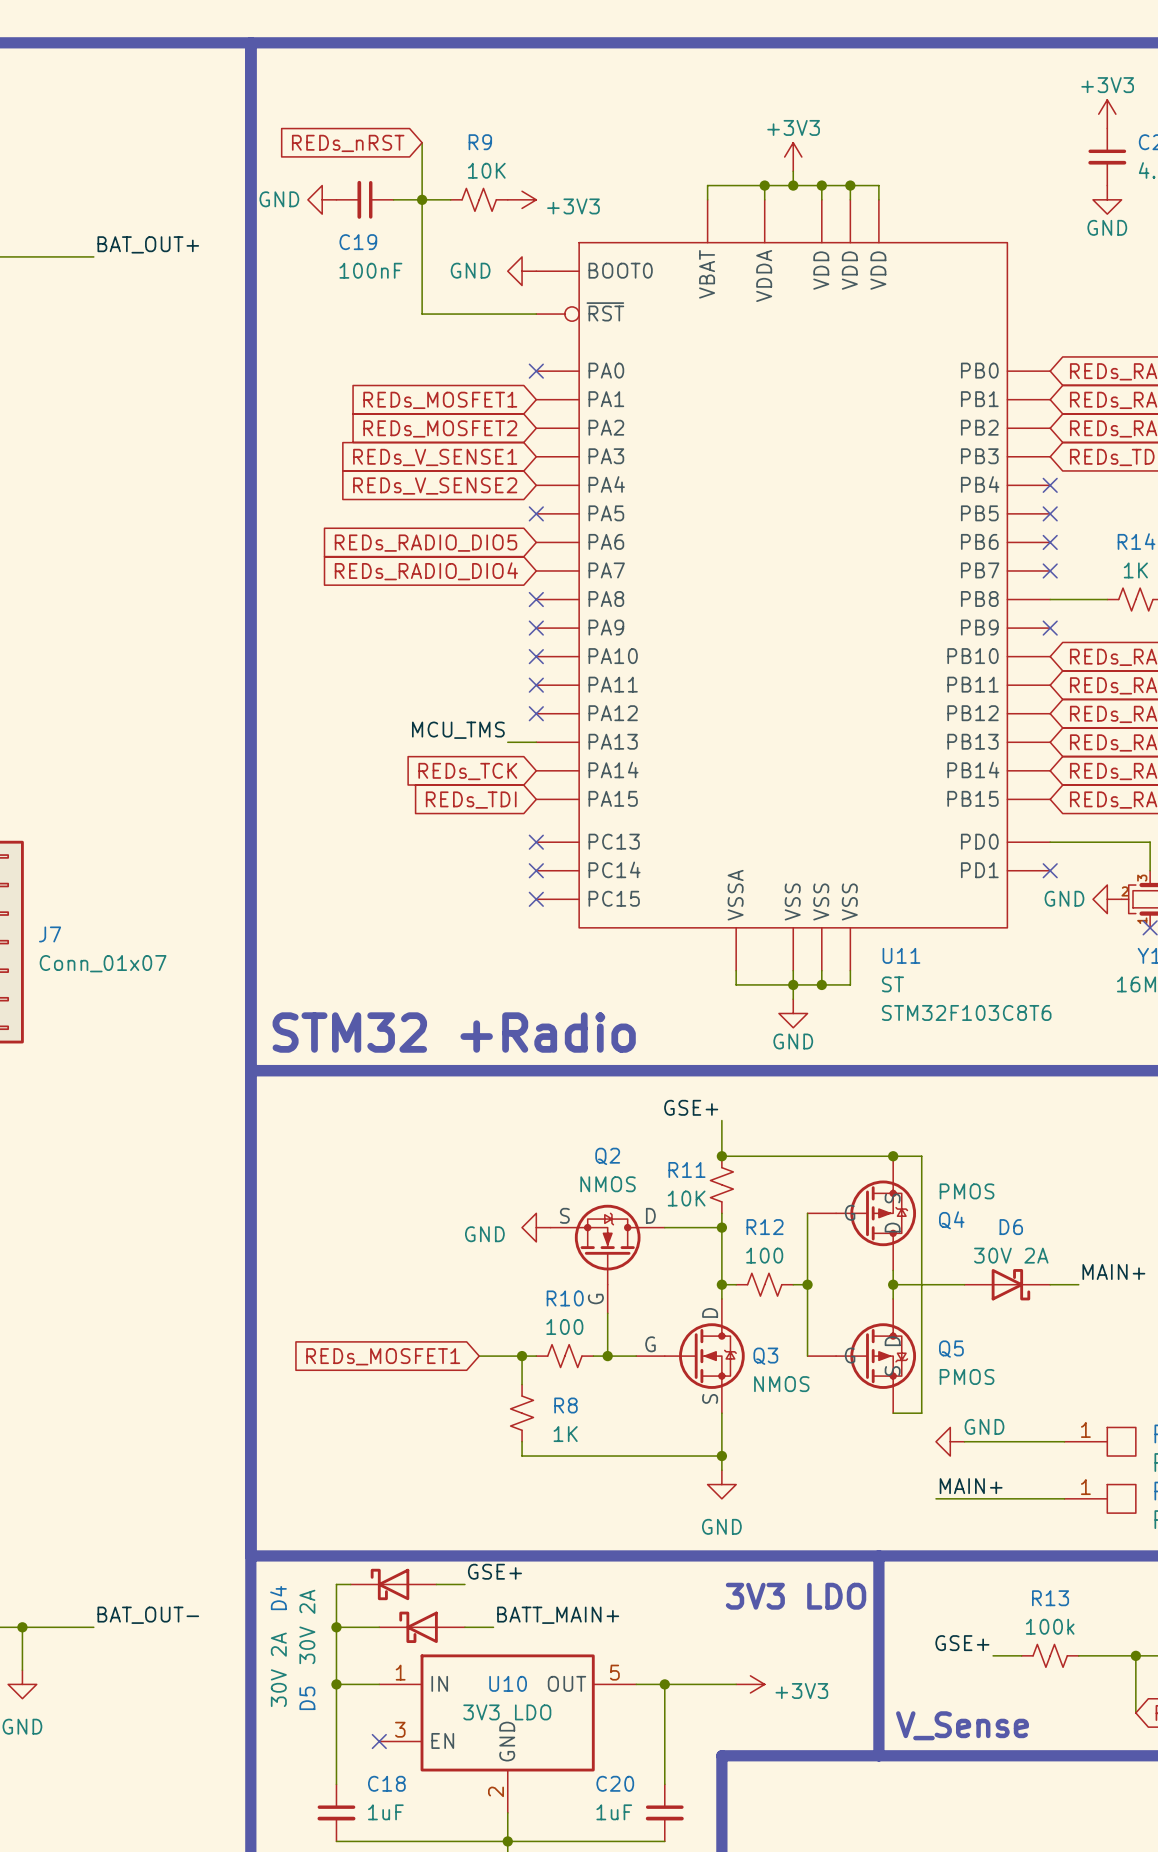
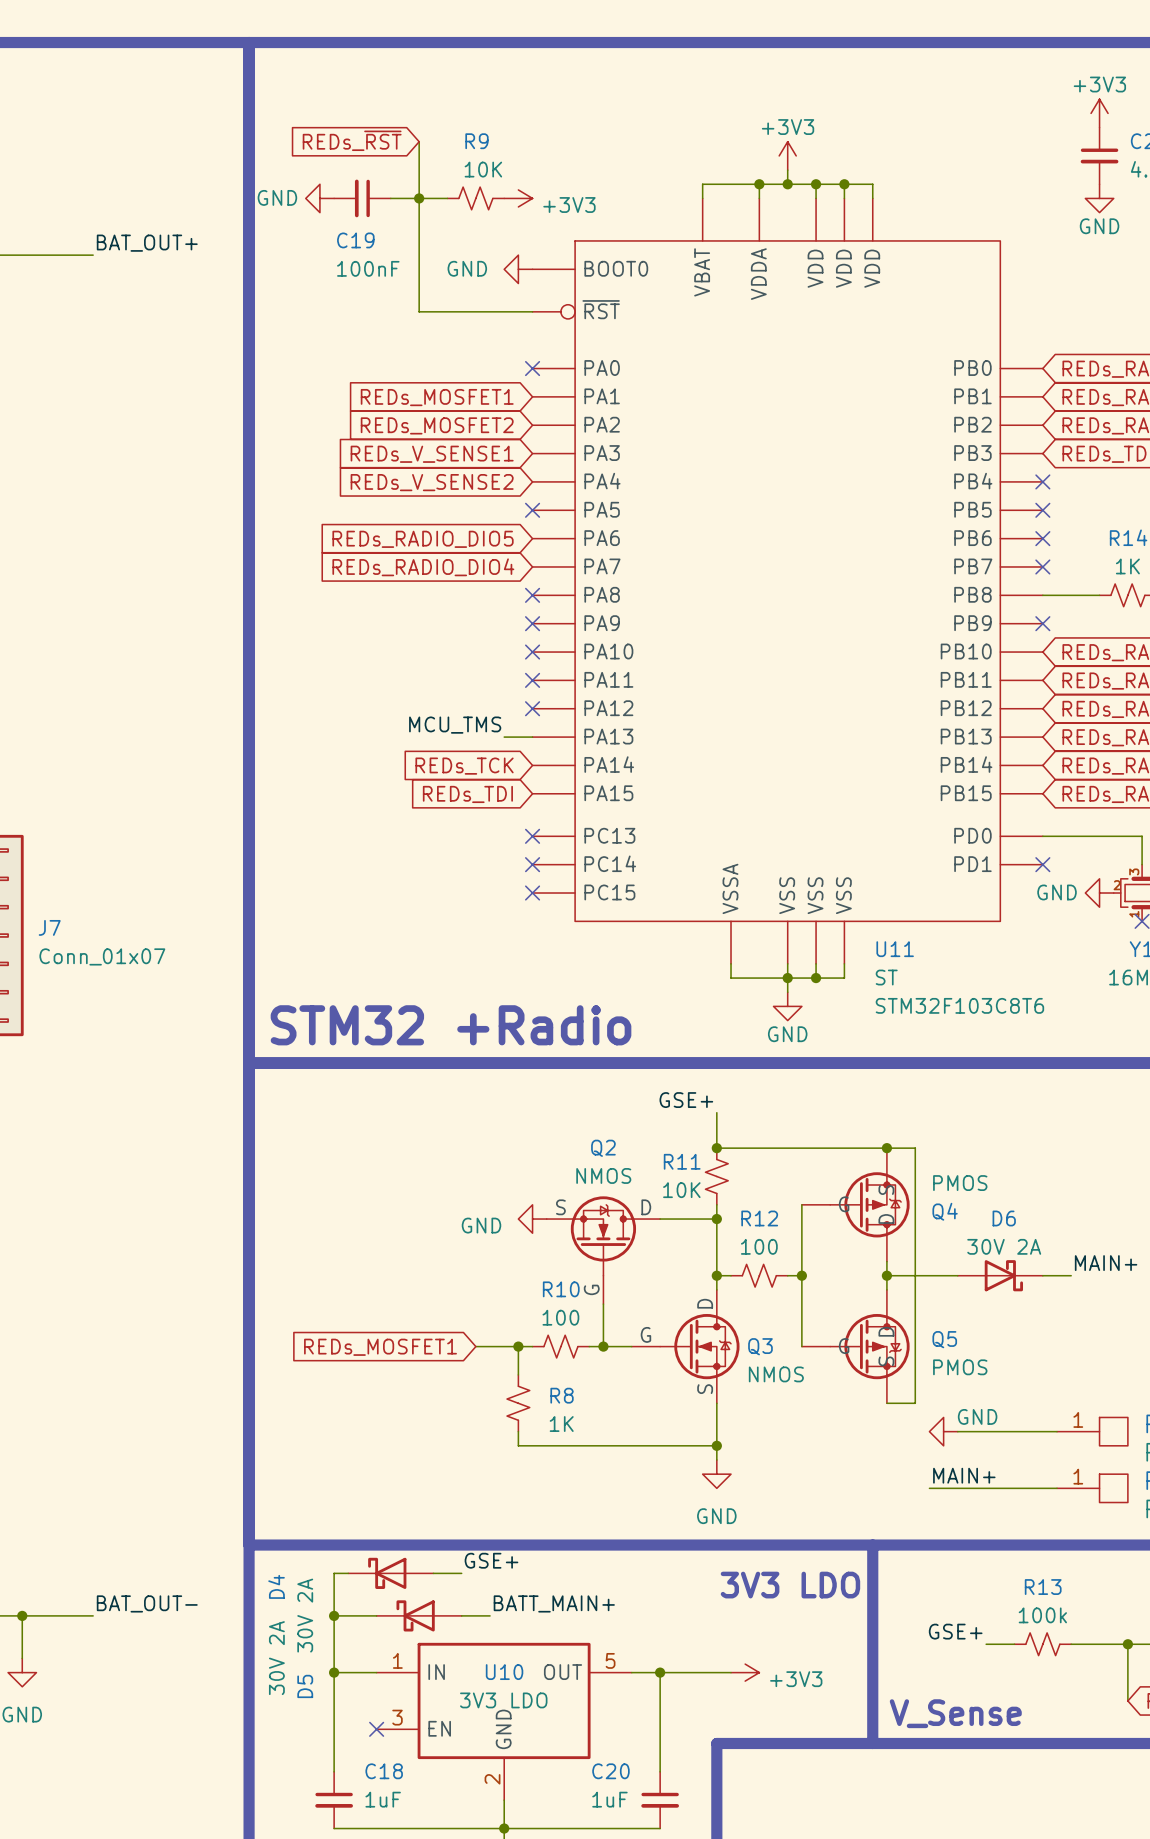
global label: REDs_nRST (348, 143) -> REDs_~{RST} (352, 140)

